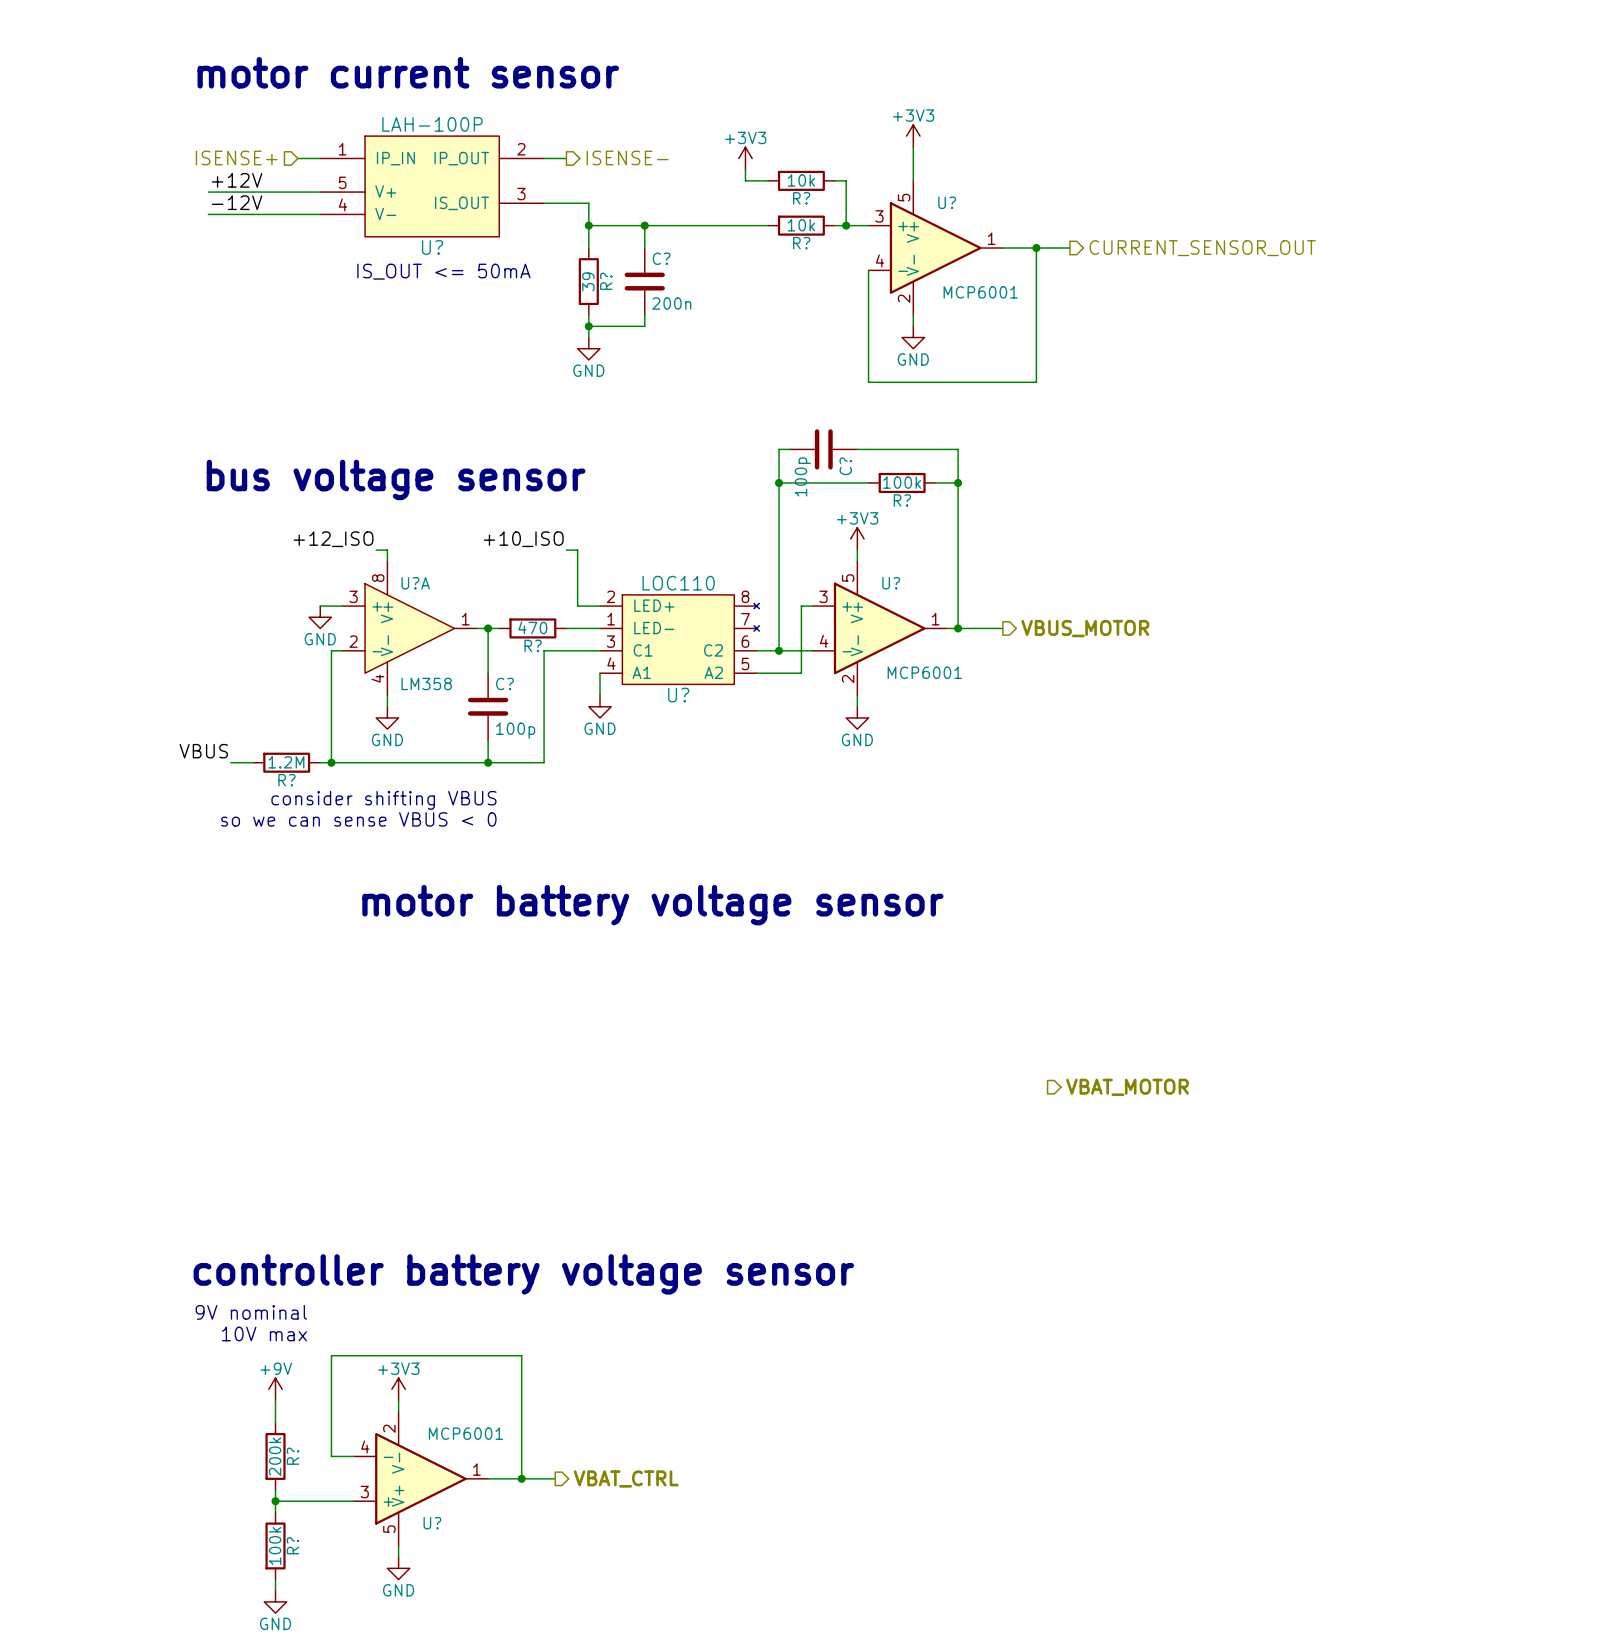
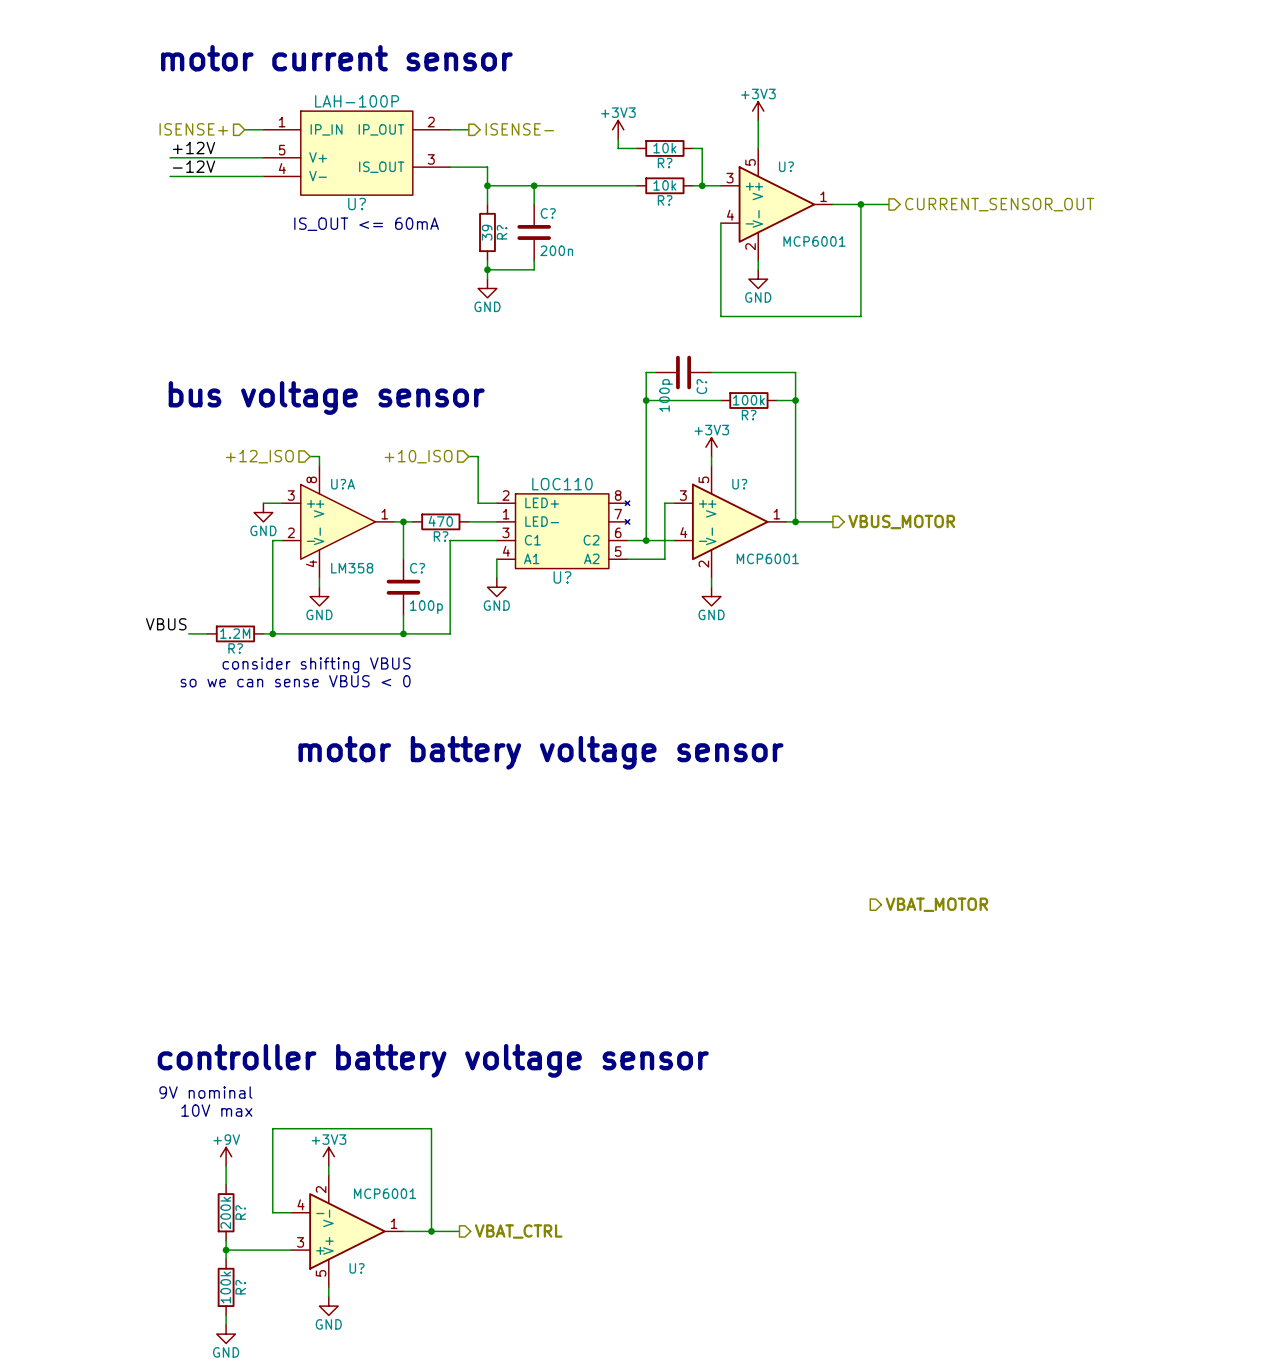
text: IS_OUT <= 50mA (443, 271) -> IS_OUT <= 60mA (366, 224)
label: +12_ISO (333, 539) -> none
label: +10_ISO (523, 539) -> none
hierarchical label: none -> +12_ISO (259, 456)
hierarchical label: none -> +10_ISO (418, 456)

